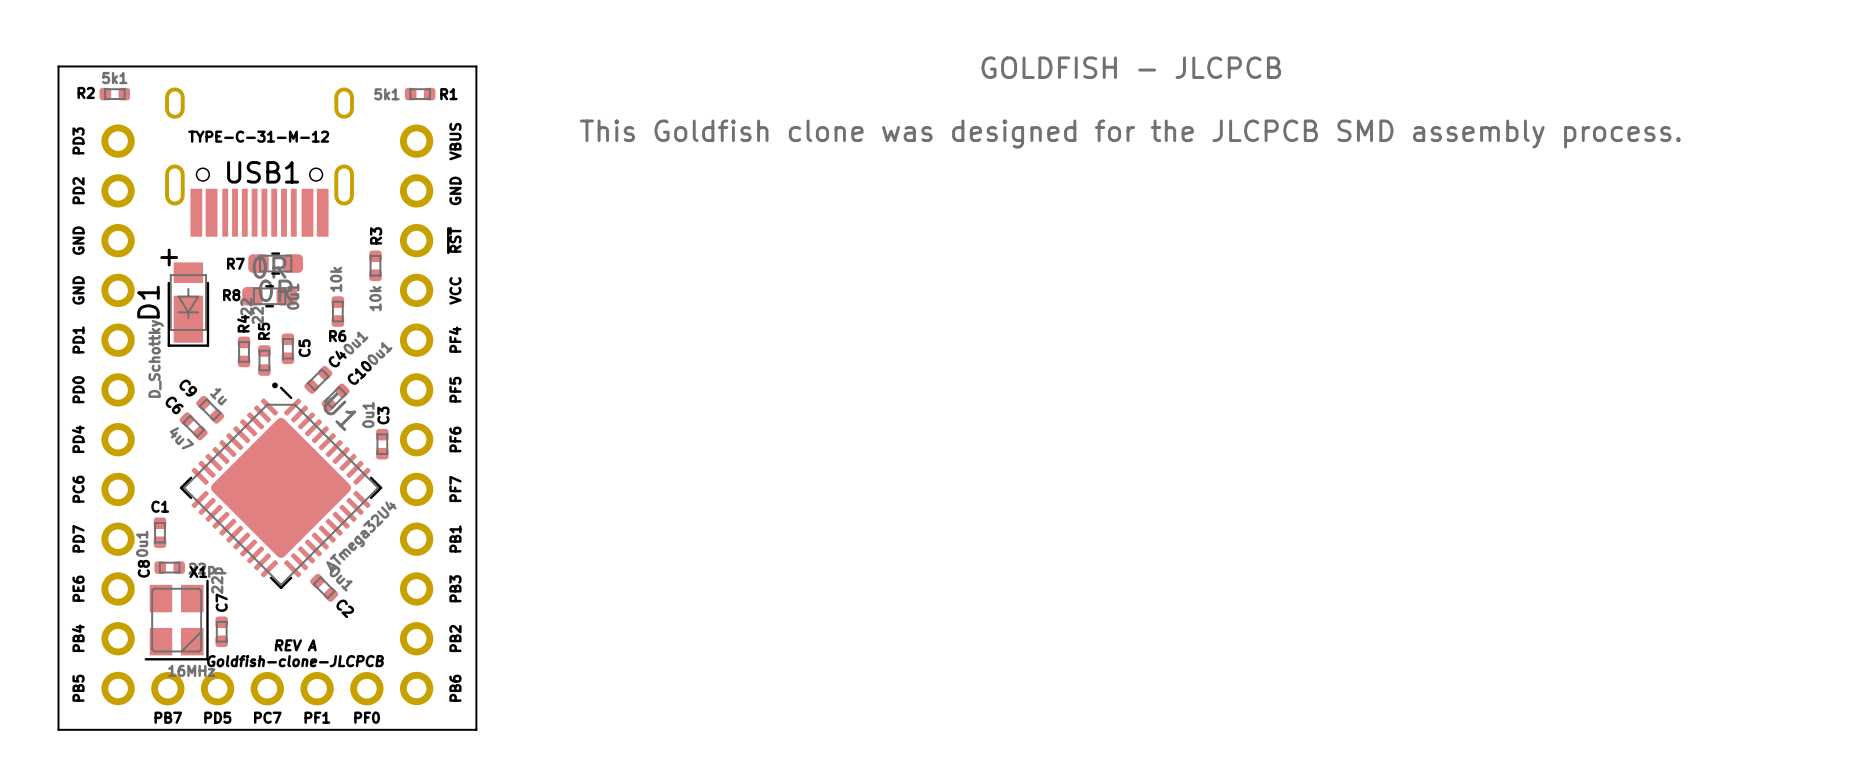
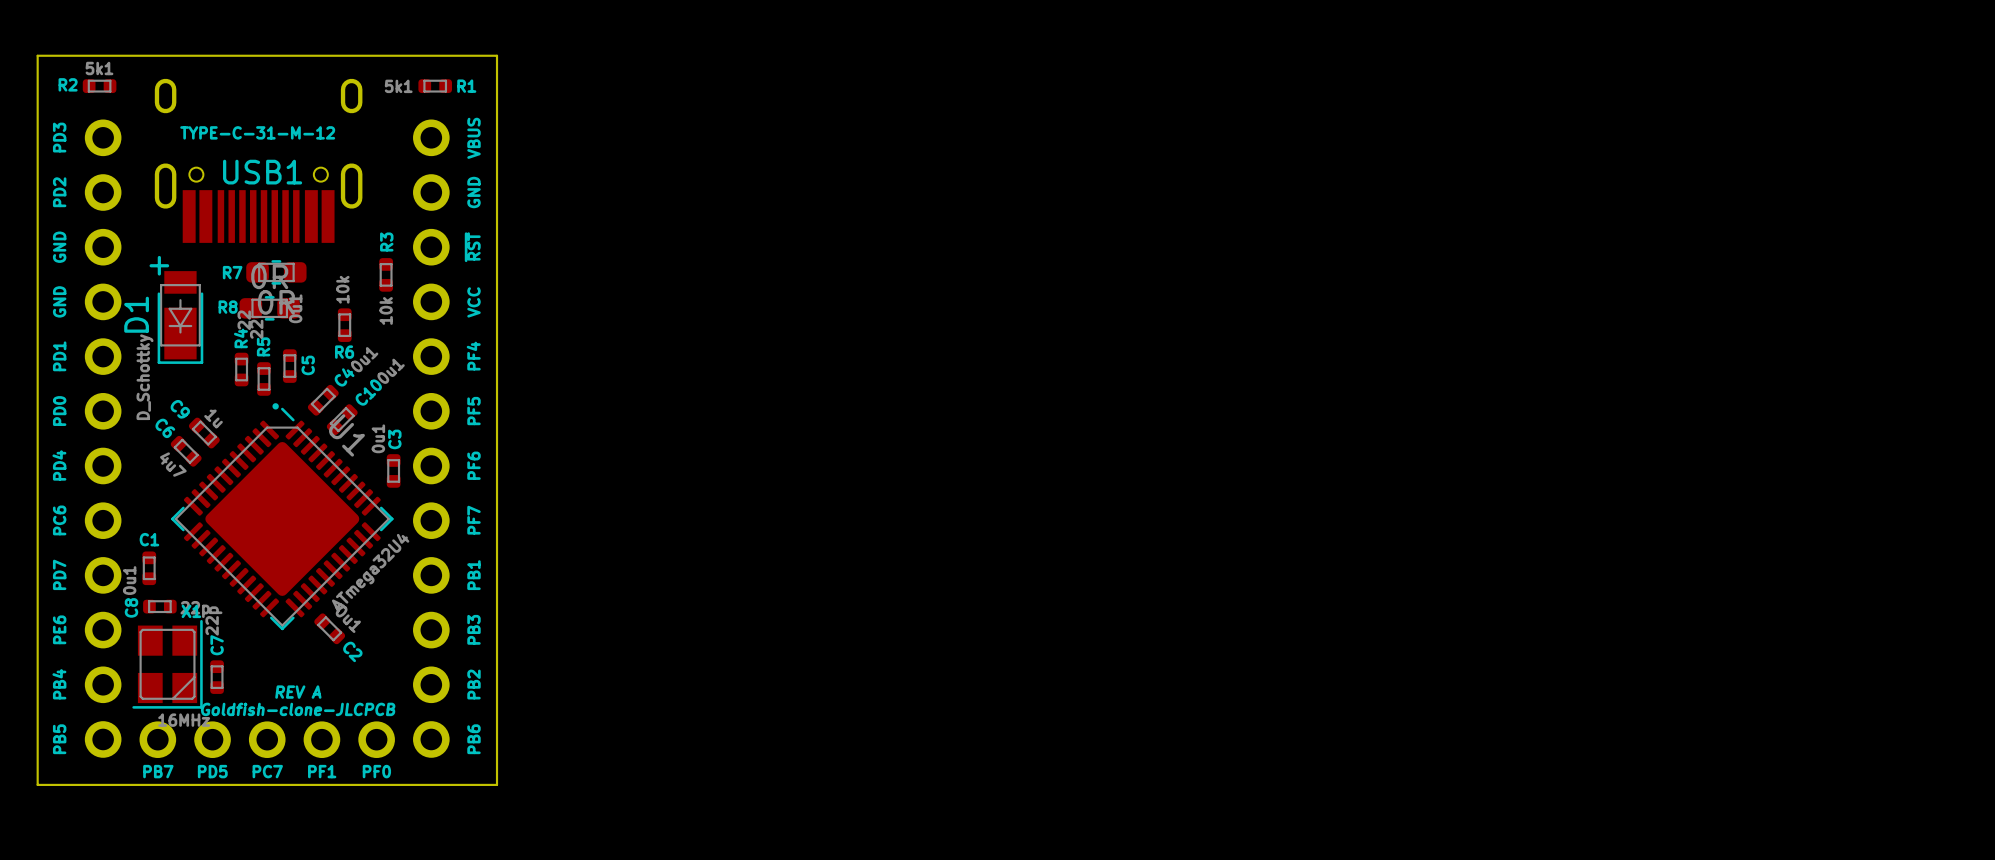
text: GOLDFISH - JLCPCB (1131, 67) -> none
text: This Goldfish clone was designed for the JLCPCB SMD assembly process. (1130, 134) -> none

